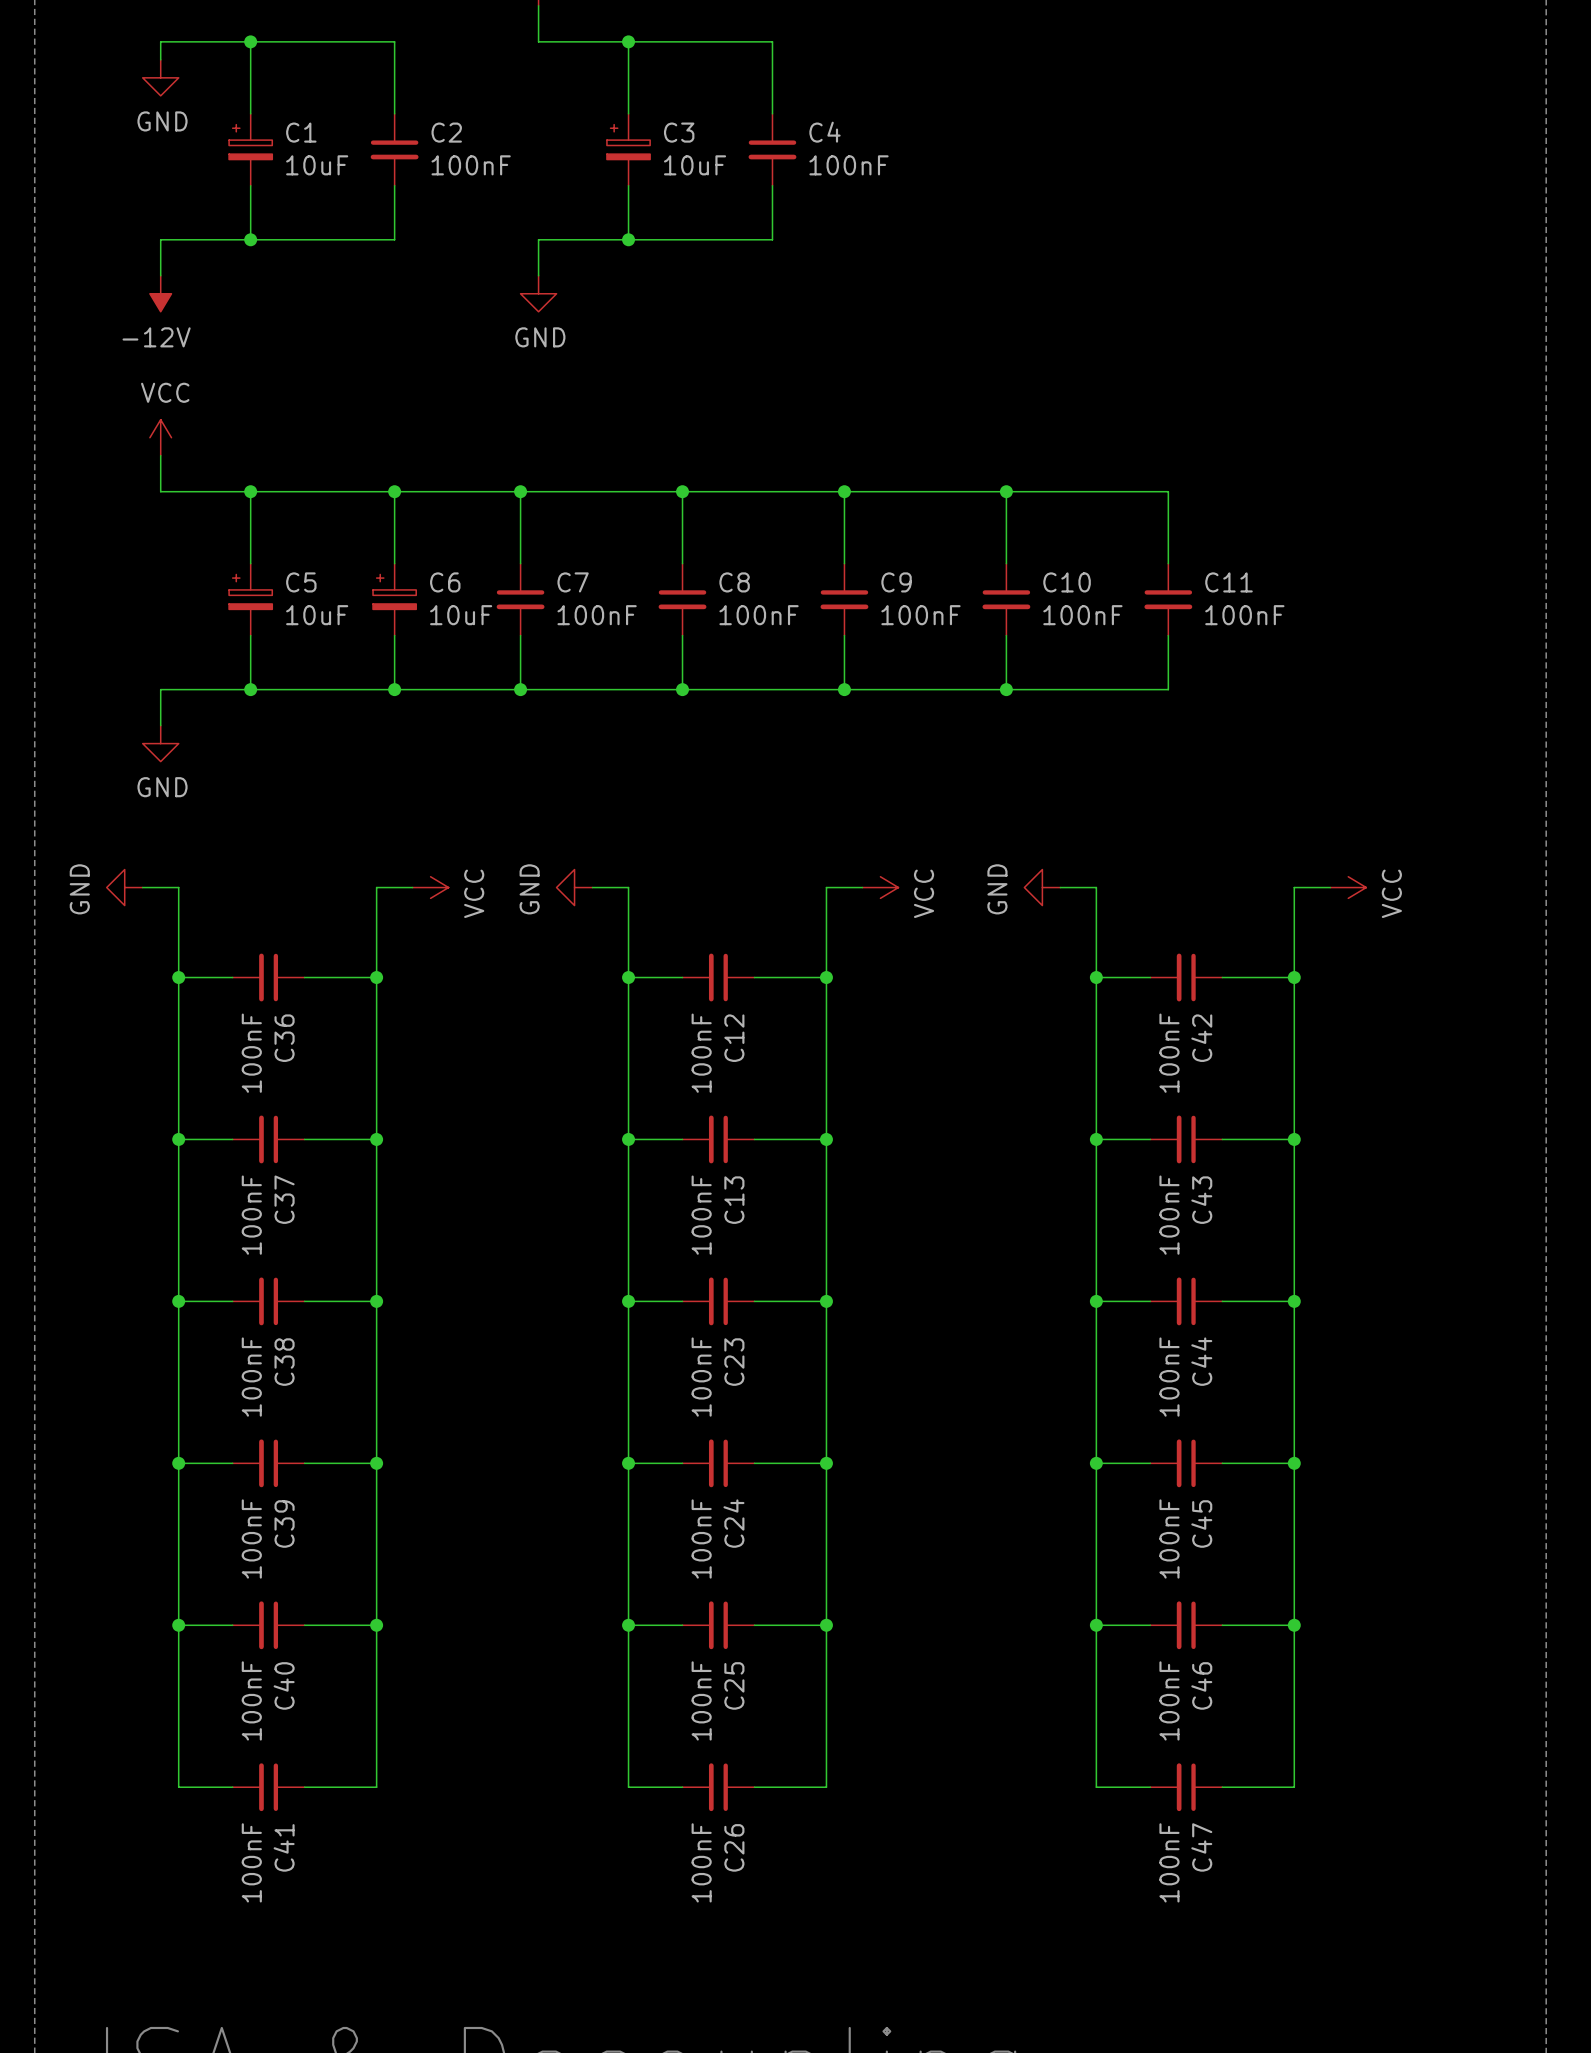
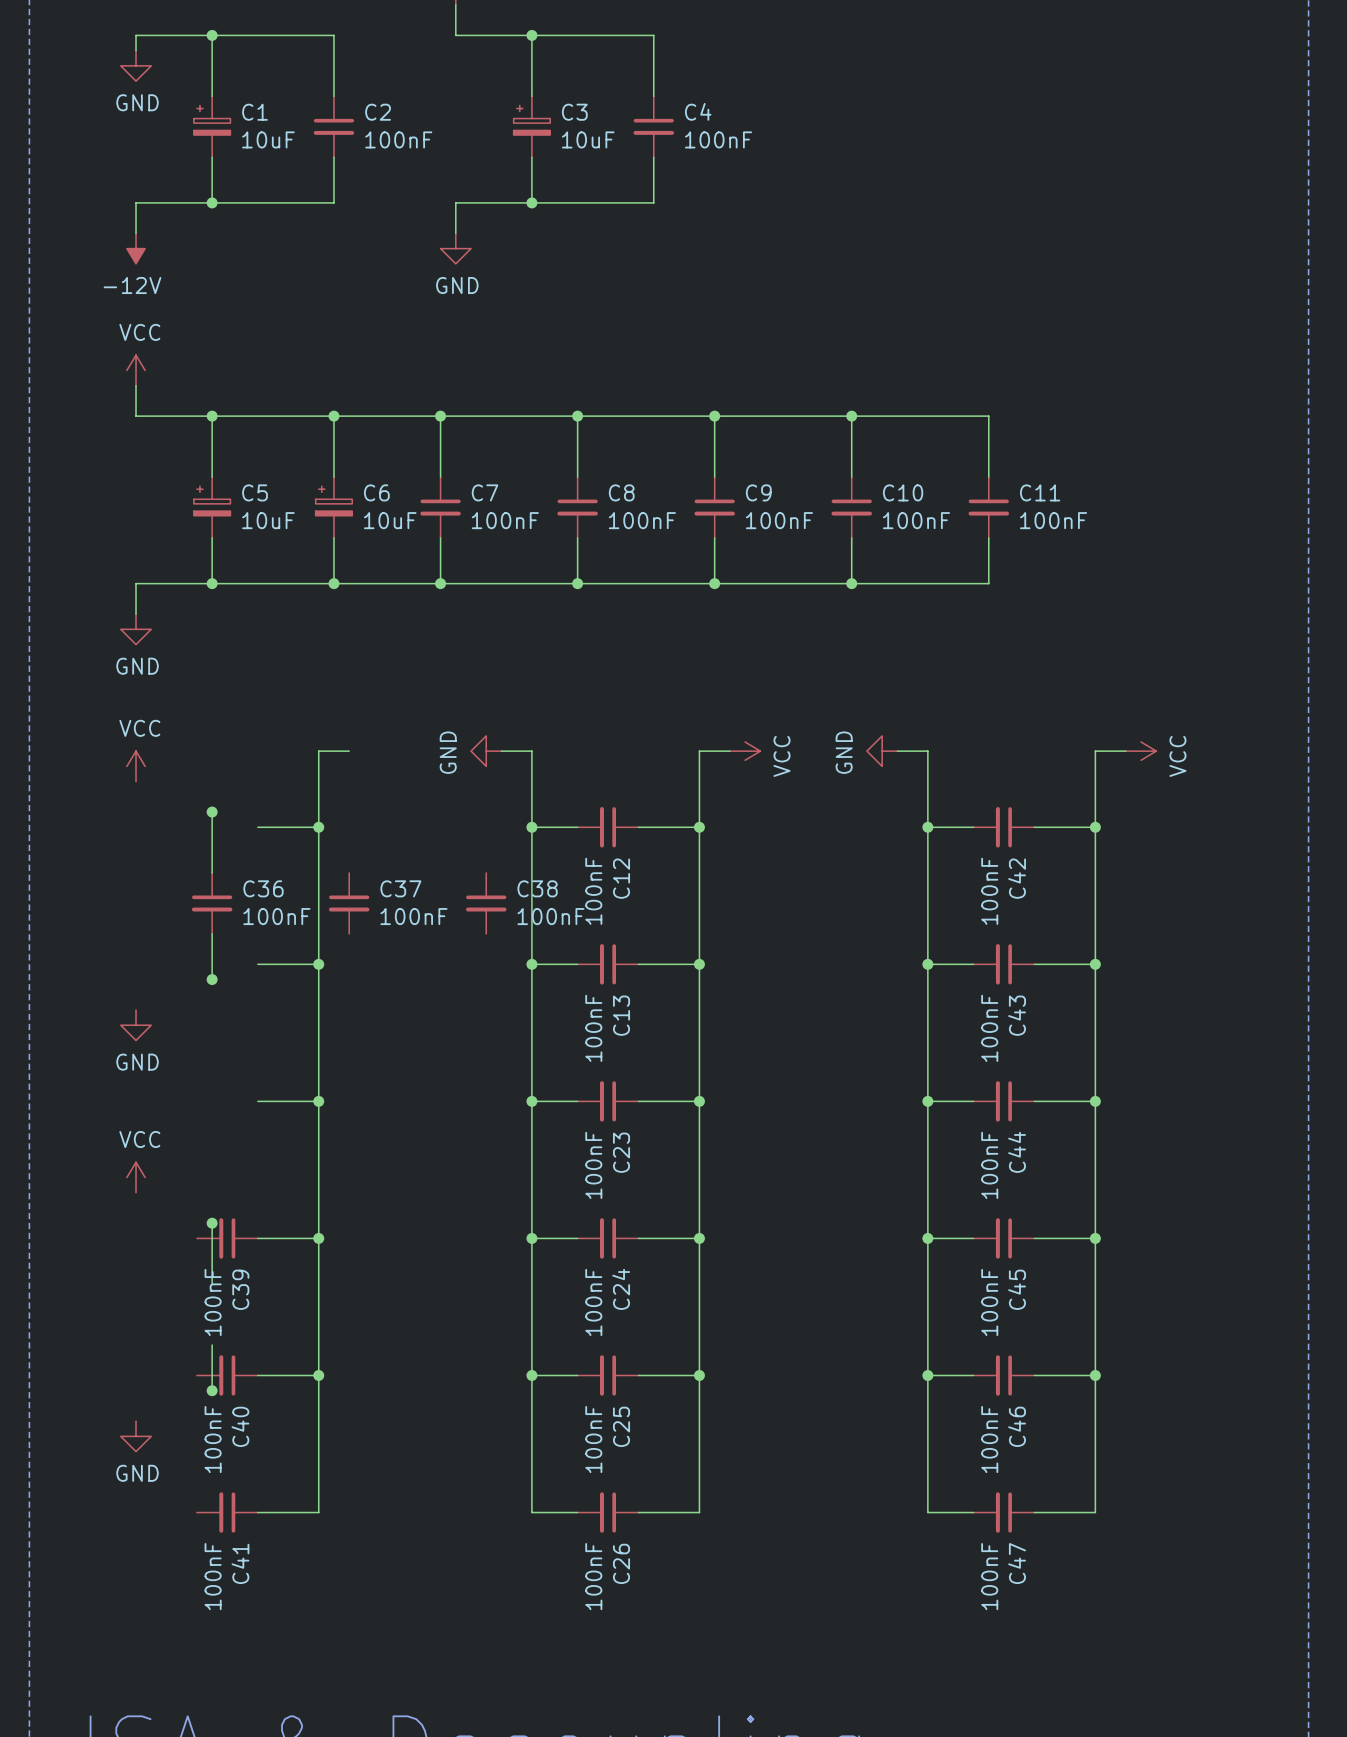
power symbol rotation: 0° (124, 887) -> 90° counterclockwise (136, 1025)
power symbol position: GND (124, 887) -> GND (136, 1025)
wire: (142, 887) (178, 887) (178, 1787) (232, 1787) -> none
power symbol rotation: 0° (430, 887) -> 90° counterclockwise (136, 766)
power symbol position: VCC (430, 887) -> VCC (136, 766)
wire: none -> (212, 812) (212, 872)
wire: (178, 977) (232, 977) -> none
junction position: (178, 977) -> (212, 812)
C36 rotation: 0° (268, 977) -> 90° counterclockwise (212, 903)
C36 position: (268, 977) -> (212, 903)
wire: none -> (212, 933) (212, 979)
wire: (178, 1139) (232, 1139) -> none
junction position: (178, 1139) -> (212, 979)
C37 rotation: 0° (268, 1139) -> 90° counterclockwise (349, 903)
C37 position: (268, 1139) -> (349, 903)
wire: (178, 1301) (232, 1301) -> none
junction: (178, 1301) -> none
C38 rotation: 0° (268, 1301) -> 90° counterclockwise (486, 903)
C38 position: (268, 1301) -> (486, 903)
power symbol: none -> VCC (136, 1177)
wire: none -> (212, 1223) (212, 1284)
wire: (178, 1463) (232, 1463) -> none
junction position: (178, 1463) -> (212, 1223)
wire: none -> (212, 1345) (212, 1390)
wire: (178, 1625) (232, 1625) -> none
junction position: (178, 1625) -> (212, 1390)
power symbol: none -> GND (136, 1436)

